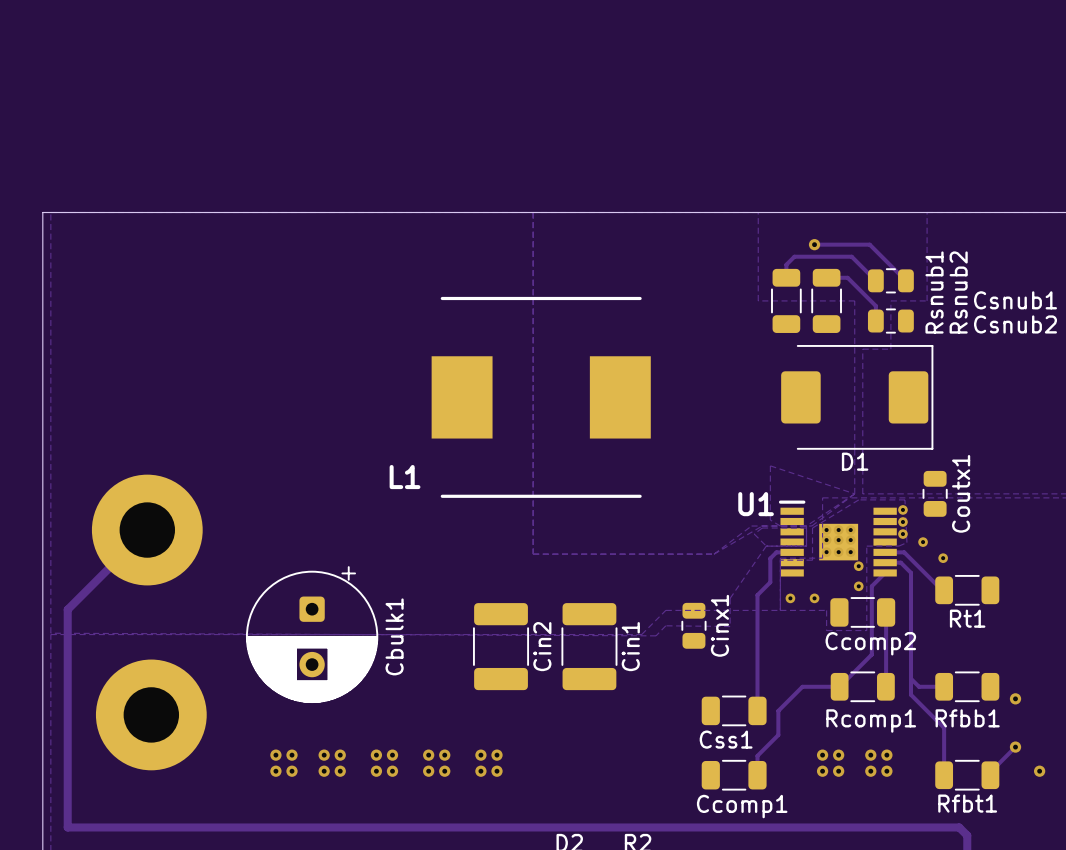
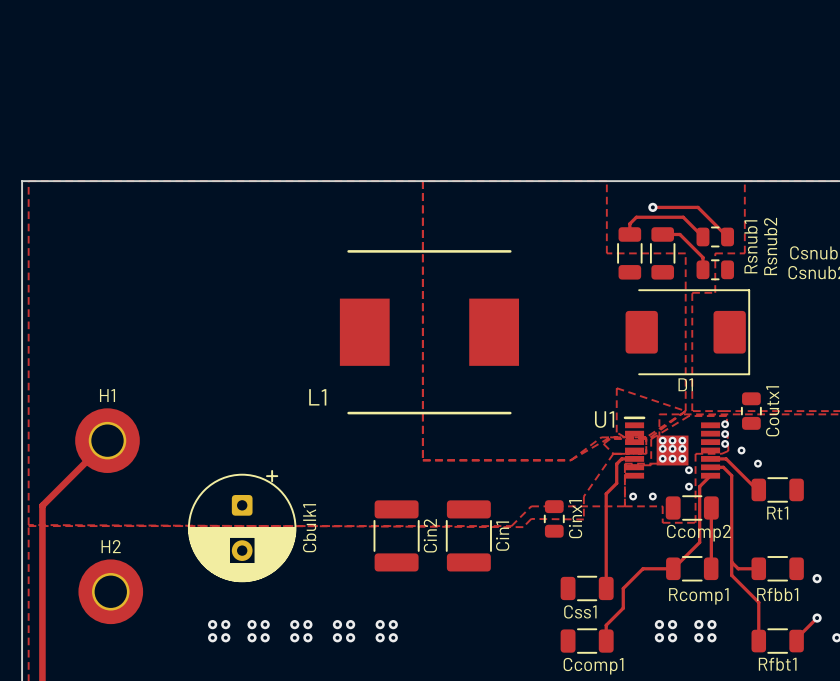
part: (147, 530) -> none
H1: none -> (107, 440)
part: (151, 714) -> none
H2: none -> (110, 591)

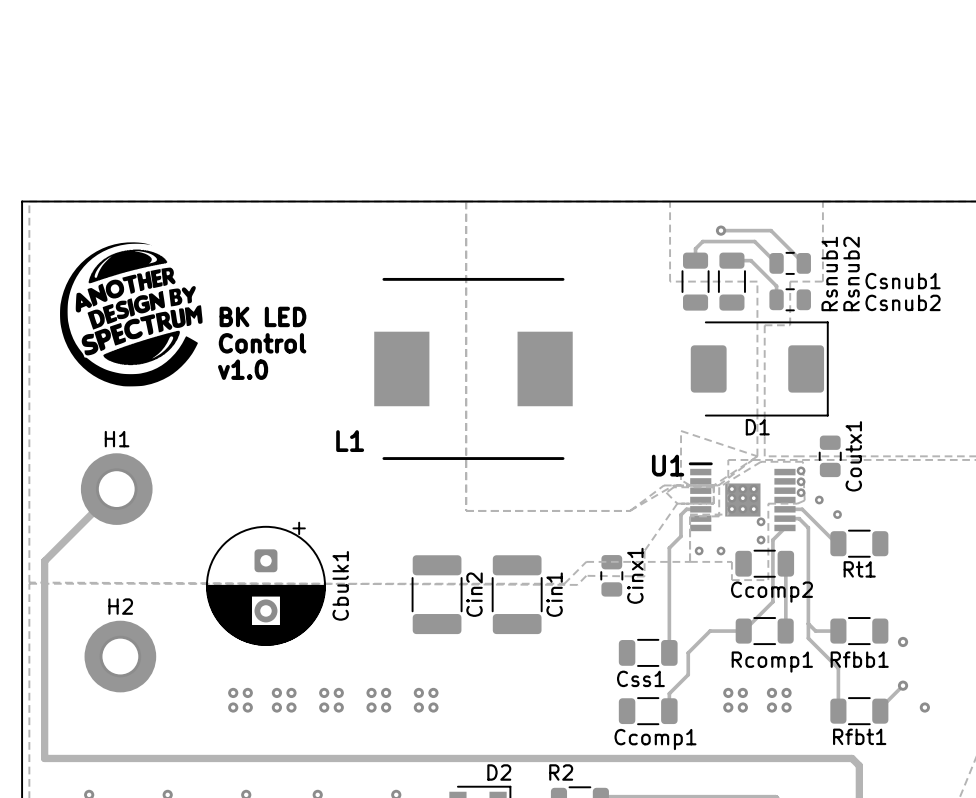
drawing: none -> [60, 242, 203, 387]
text: none -> BK LED (262, 316)
text: none -> Control (262, 343)
text: none -> v1.0 (243, 369)

